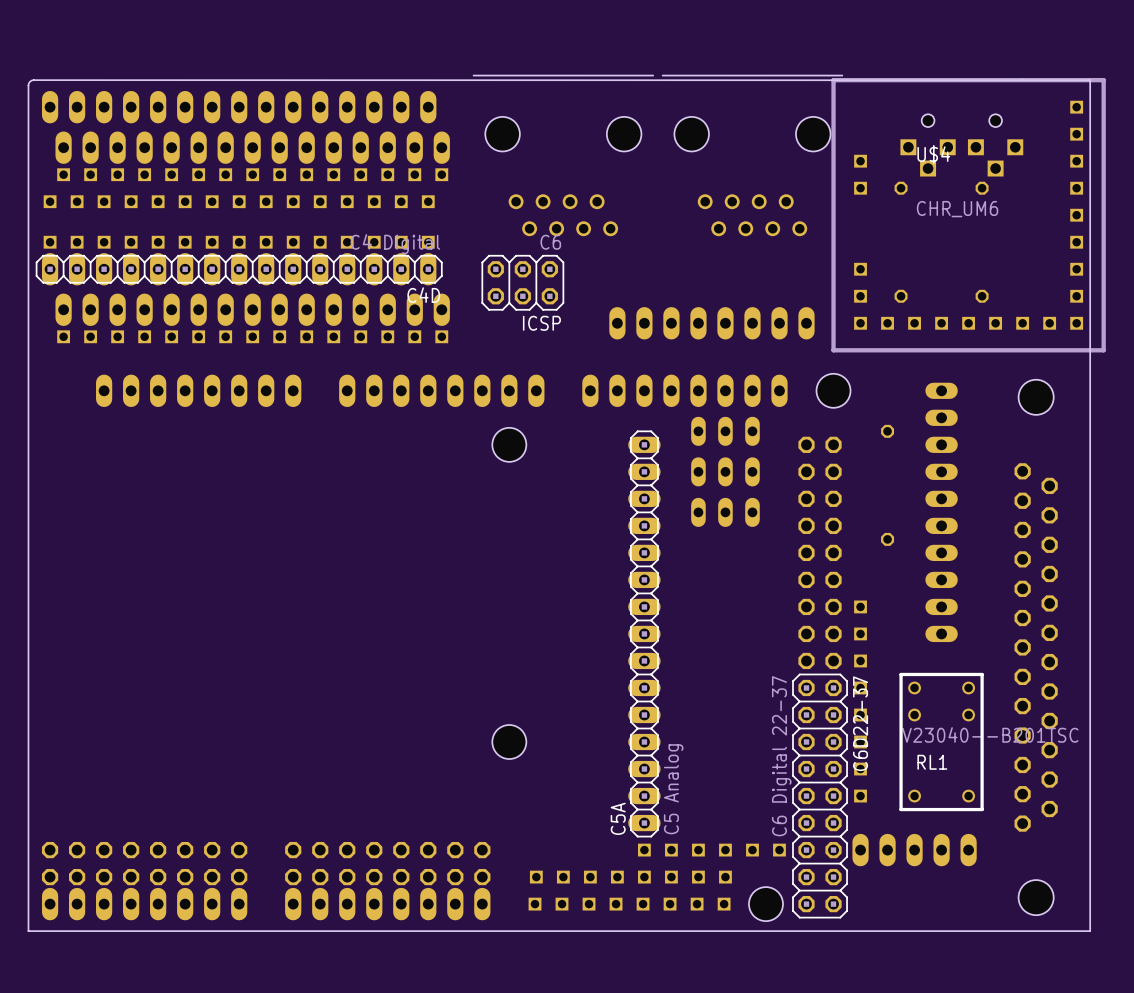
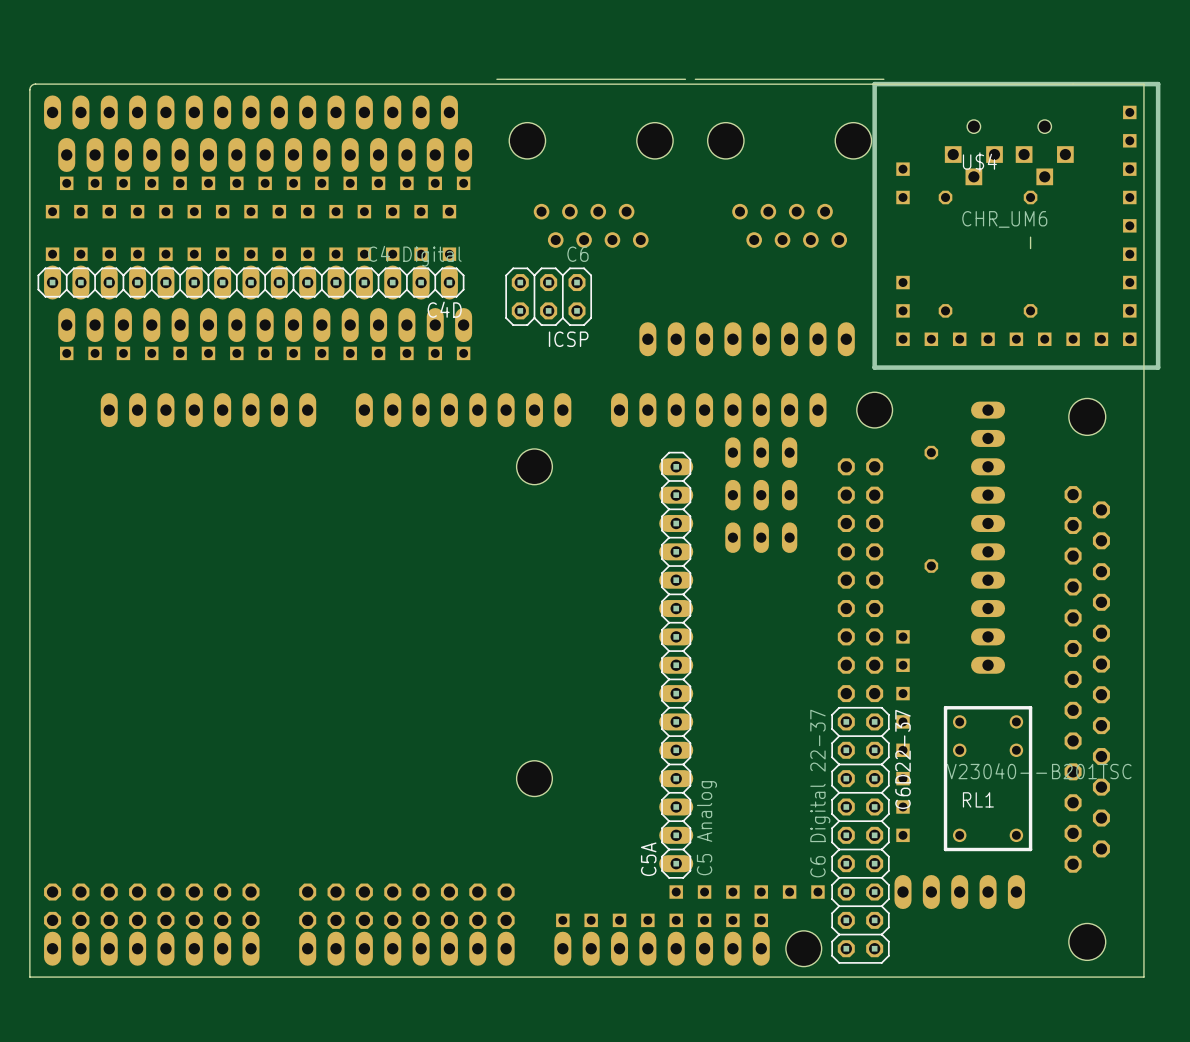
board edge: none -> (1030, 237) (1030, 248)
part footprint: [528, 897, 731, 911] -> [554, 931, 770, 966]

